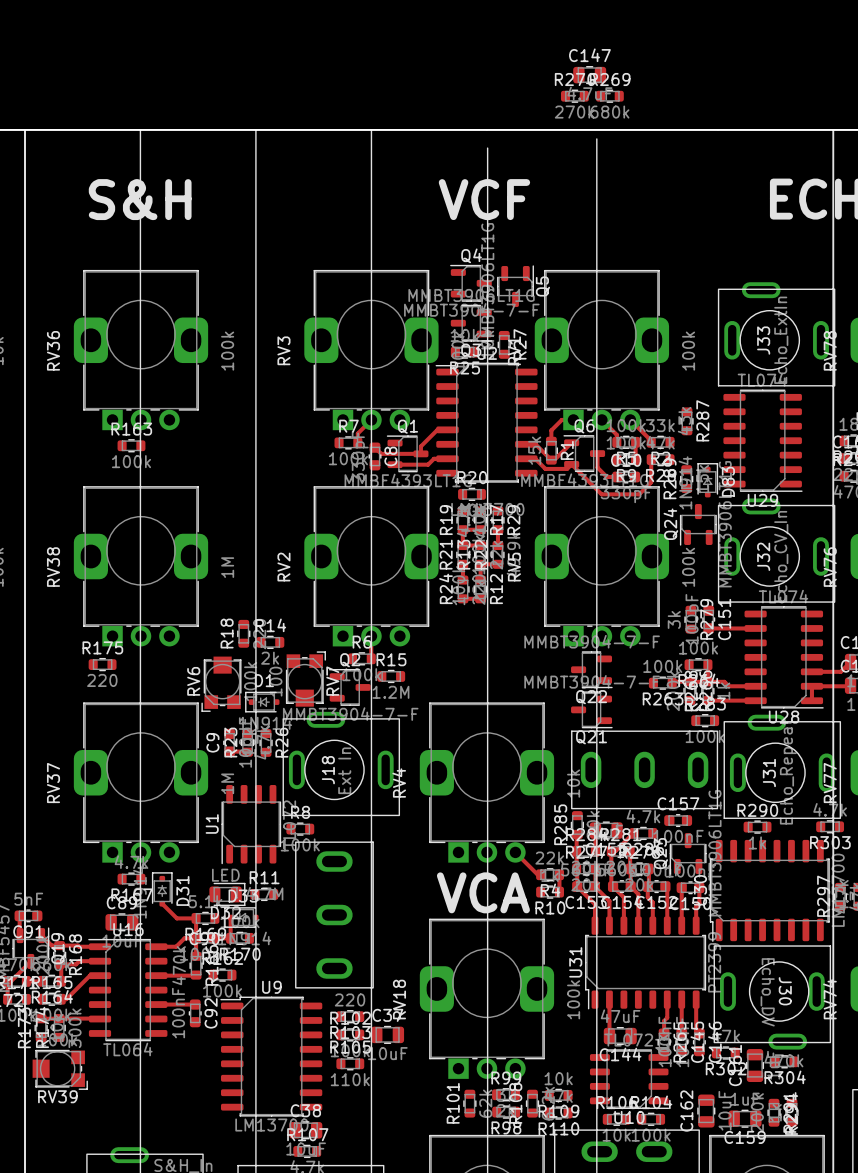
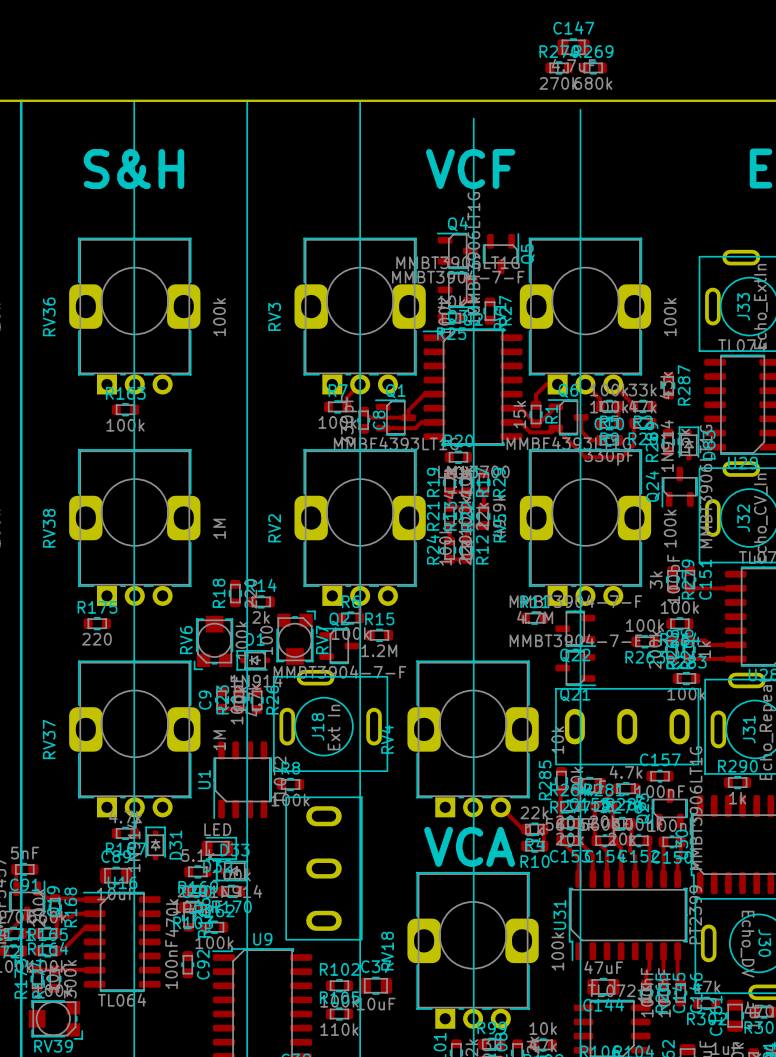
R11 position: (264, 894) -> (534, 618)
top track: (162, 903) (176, 918) (196, 918) (196, 956) -> none
top track: (230, 917) (230, 938) -> none
top track: (196, 938) (184, 938) (176, 946) (156, 946) -> none
top track: (196, 975) (156, 975) -> none
top track: (609, 999) (609, 1036) -> none
top track: (156, 1004) (195, 1004) -> none
R103 position: (350, 1016) -> (192, 907)

